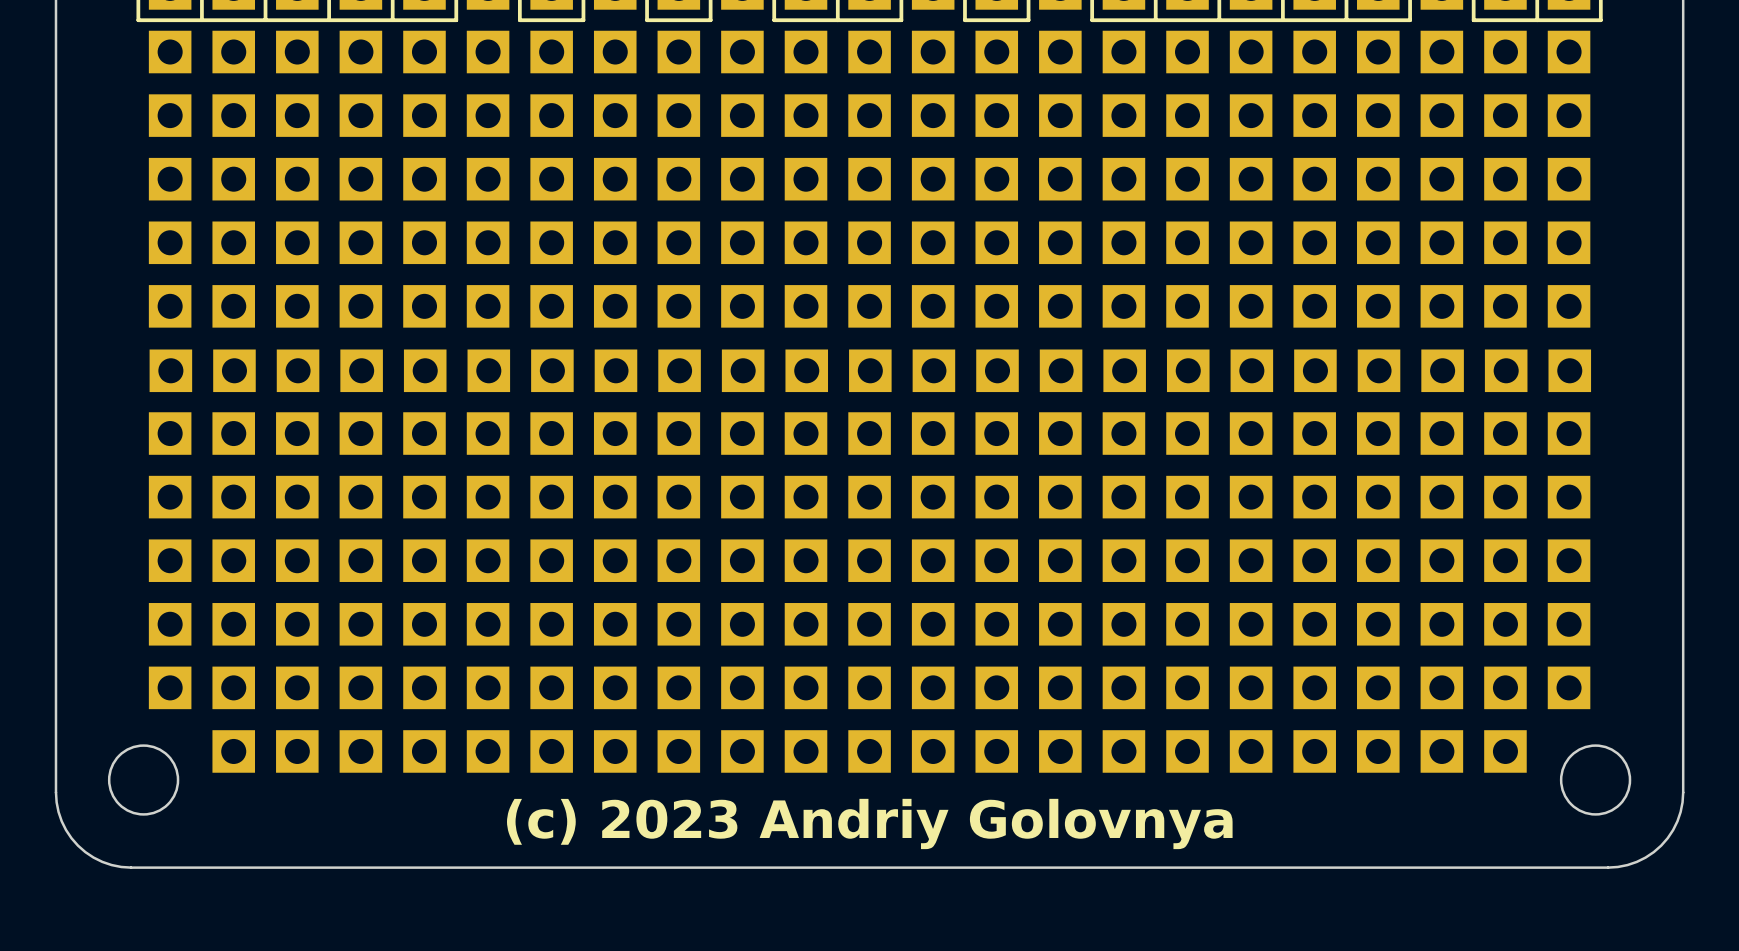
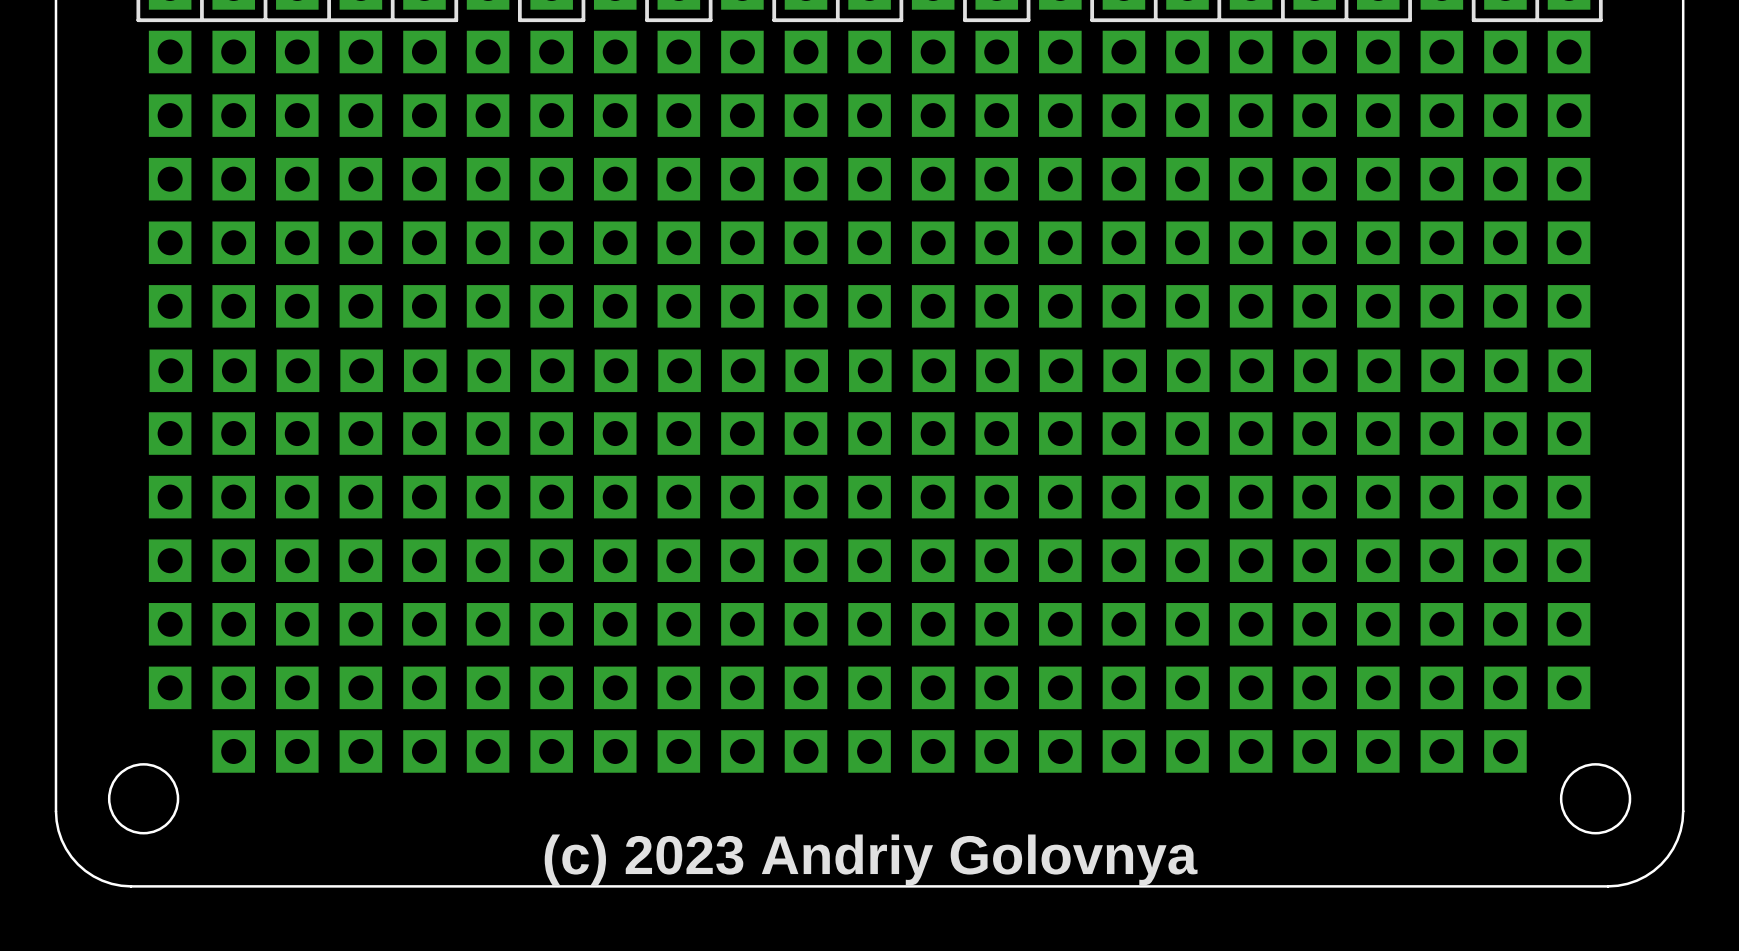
round board edge position: (143, 780) -> (143, 798)
round board edge position: (1595, 780) -> (1595, 798)
board edge: (1683, 792) (1677, 821) (1661, 845) (1636, 861) (1608, 867) (131, 867) (102, 861) (77, 845) (61, 821) (55, 792) -> (1683, 792) (1680, 830) (1667, 857) (1653, 870) (1636, 880) (1608, 886) (131, 886) (111, 883) (93, 876) (71, 857) (58, 830) (55, 792)
text position: (c) 2023 Andriy Golovnya (869, 823) -> (c) 2023 Andriy Golovnya (871, 859)

